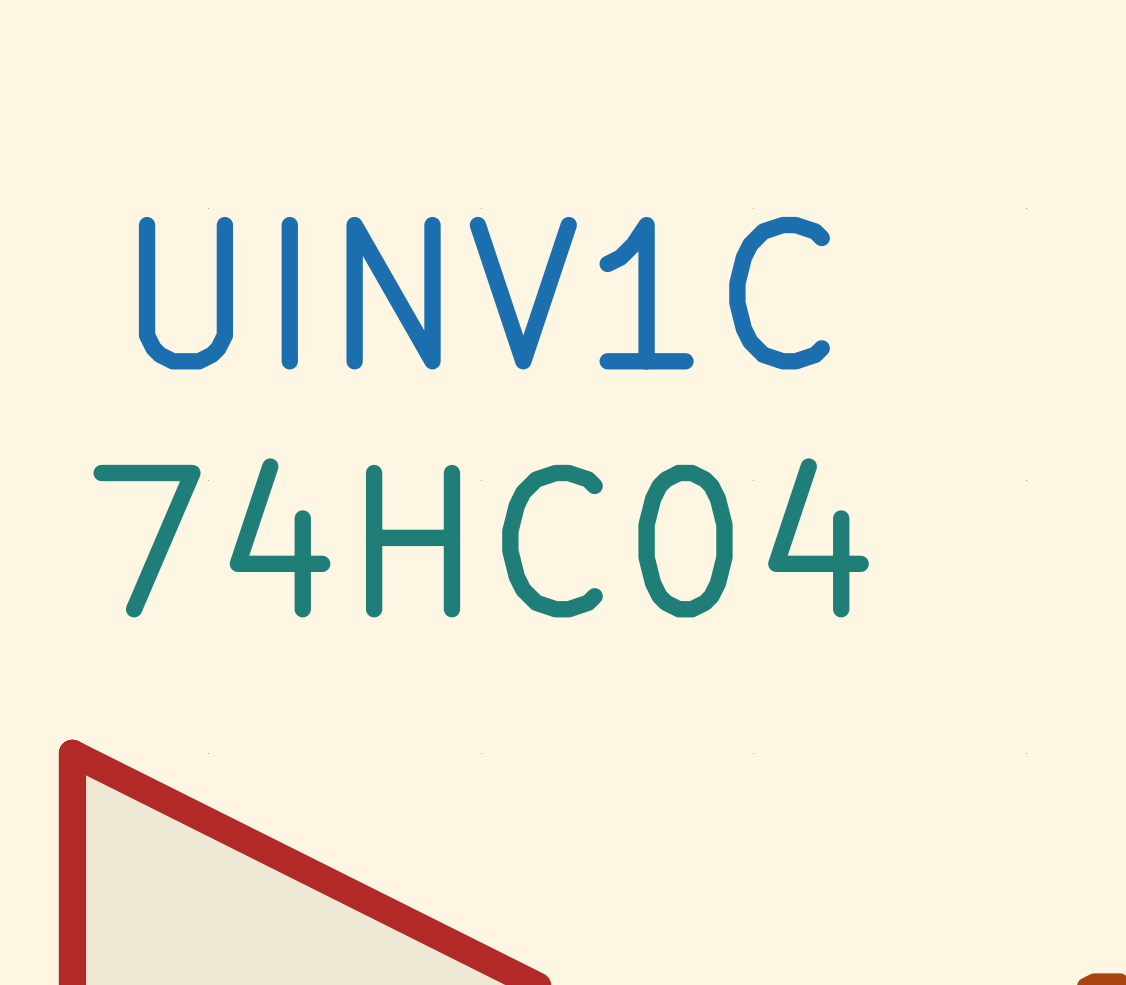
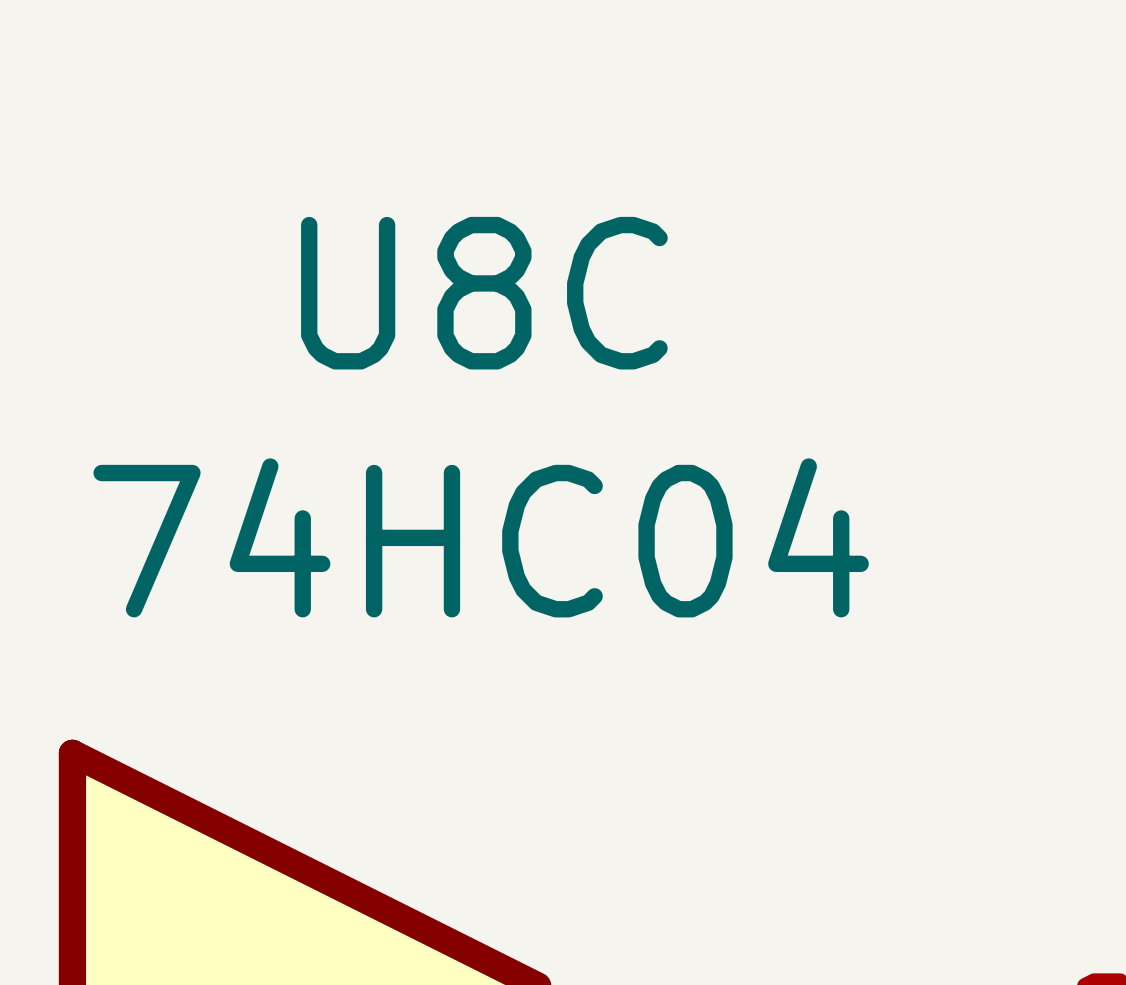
UINV1C name: UINV1C (484, 293) -> U8C (484, 293)

